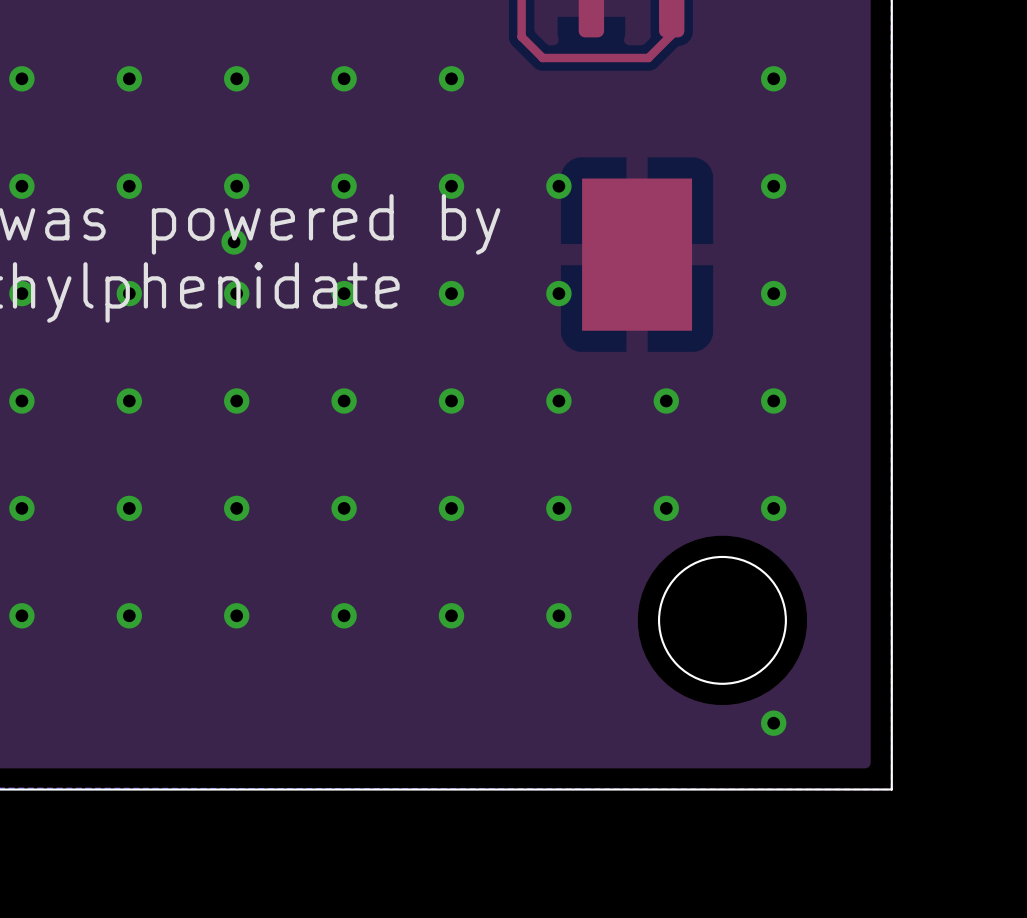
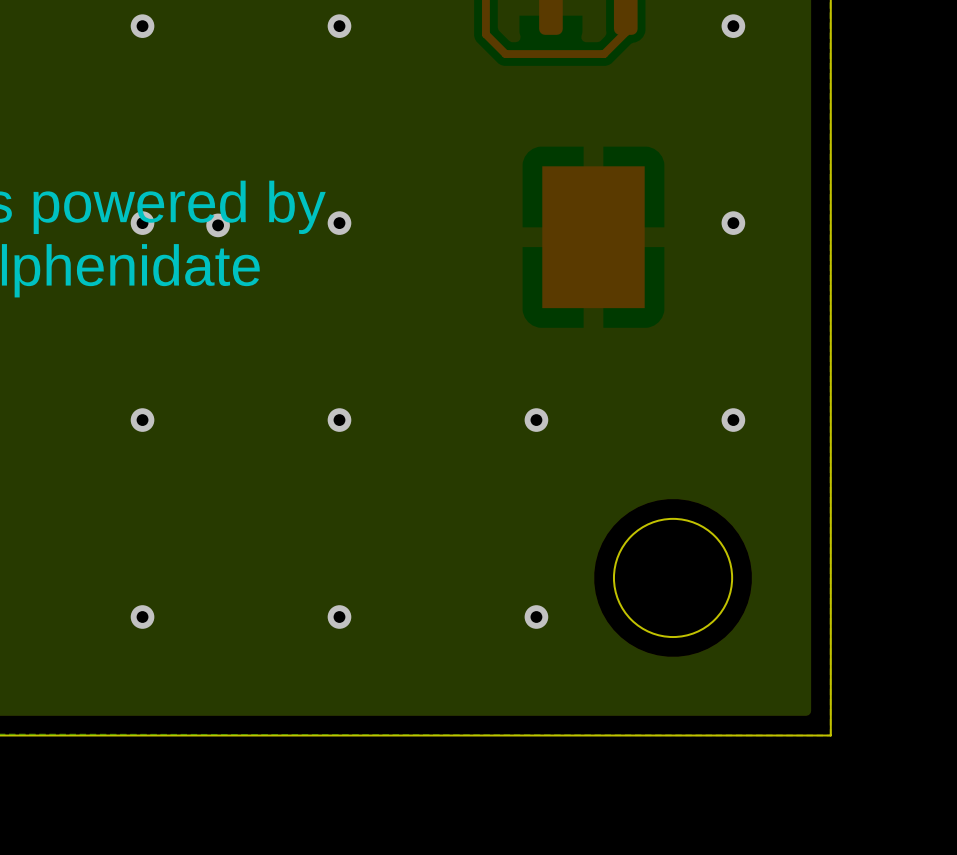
via: none -> (142, 26)
via: none -> (339, 26)
via: (21, 78) -> none
via: (129, 78) -> none
via: (236, 78) -> none
via: (344, 78) -> none
via: (451, 78) -> none
via position: (773, 78) -> (733, 26)
via: (21, 186) -> none
via: (129, 186) -> none
via: (236, 186) -> none
via: (344, 186) -> none
via: (451, 186) -> none
via: (558, 186) -> none
via: (773, 186) -> none
via: none -> (142, 223)
via: none -> (339, 223)
via: none -> (733, 223)
via: (21, 293) -> none
via: (129, 293) -> none
via: (236, 293) -> none
via: (344, 293) -> none
via: (451, 293) -> none
via: (558, 293) -> none
via: (773, 293) -> none
via: (21, 401) -> none
via: (129, 401) -> none
via: (236, 401) -> none
via: (344, 401) -> none
via: (451, 401) -> none
via: (558, 401) -> none
via: (666, 401) -> none
via: (773, 401) -> none
via: none -> (142, 420)
via: none -> (339, 420)
via: none -> (536, 420)
via: none -> (733, 420)
via: (21, 508) -> none
via: (129, 508) -> none
via: (236, 508) -> none
via: (344, 508) -> none
via: (451, 508) -> none
via: (558, 508) -> none
via: (666, 508) -> none
via: (773, 508) -> none
via: (21, 615) -> none
via: (129, 615) -> none
via: (236, 615) -> none
via: (344, 615) -> none
via: (451, 615) -> none
via position: (558, 615) -> (536, 617)
via: none -> (142, 617)
via: none -> (339, 617)
via: (773, 723) -> none

